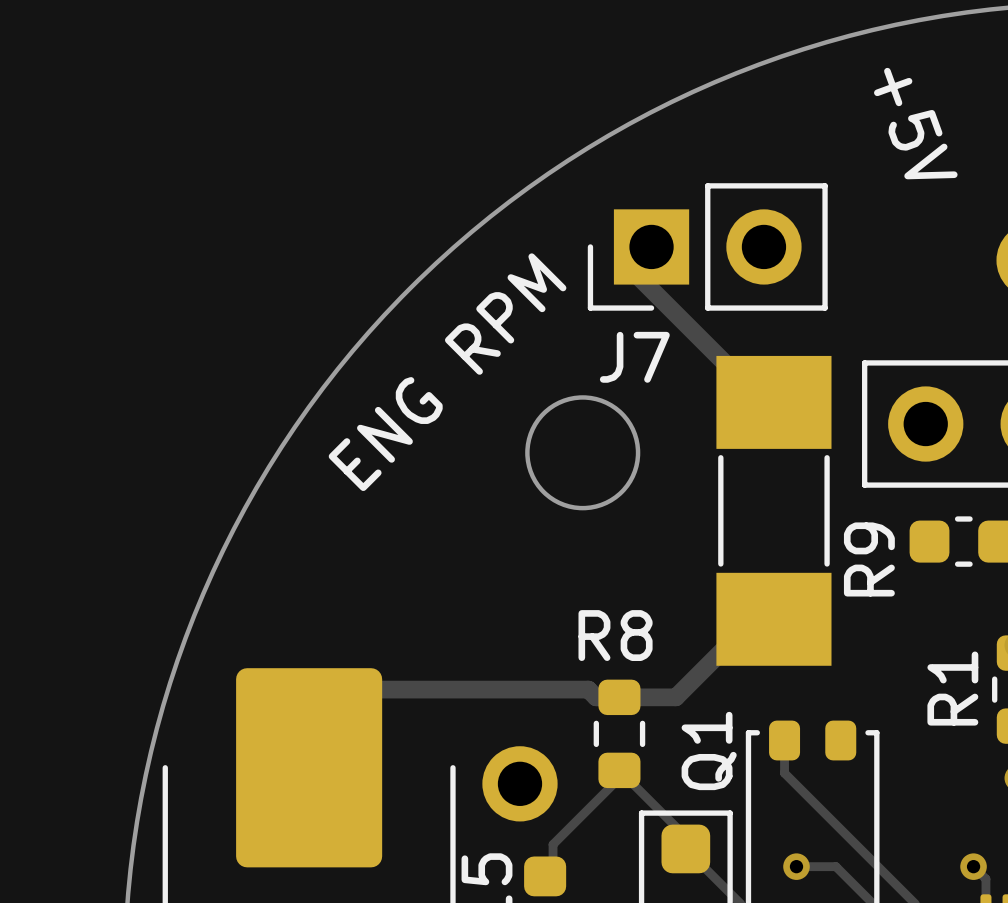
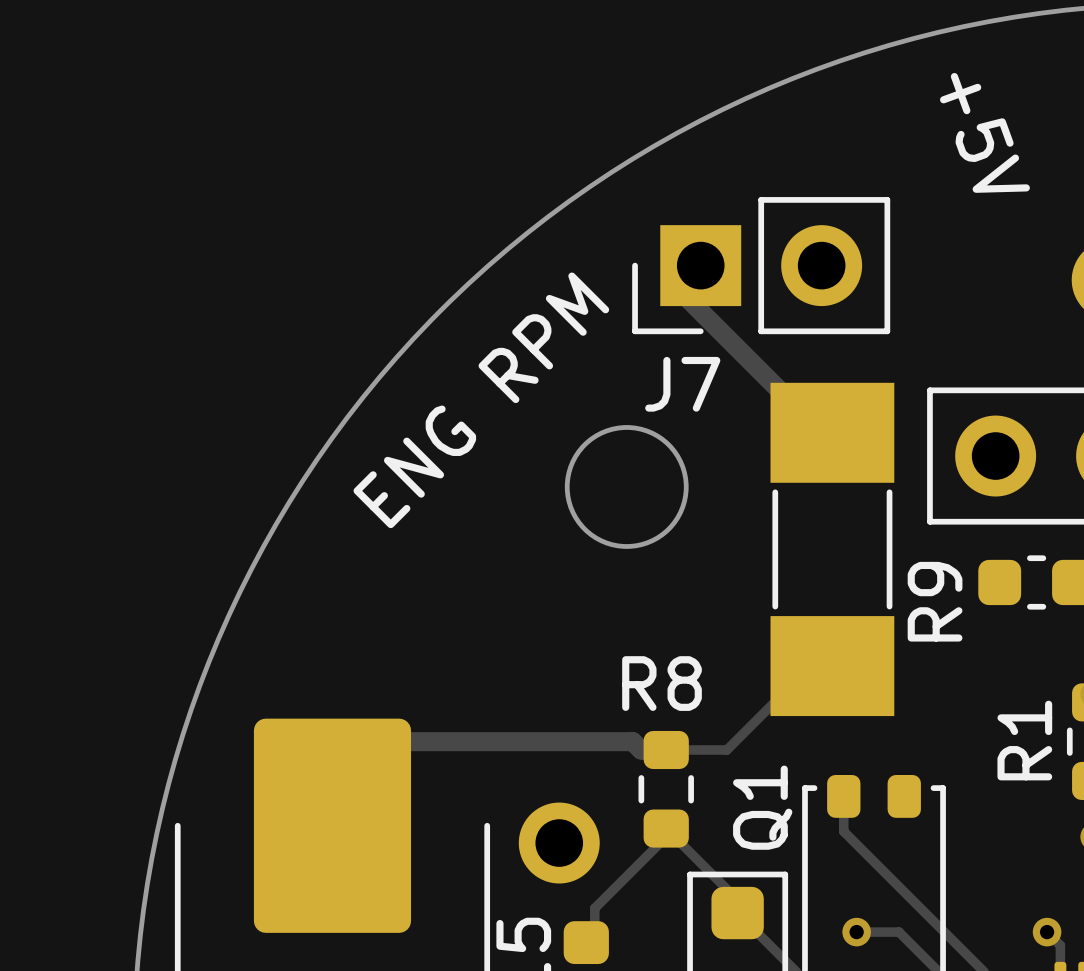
track width: thick (752, 620) (675, 697) (619, 697) -> thin (809, 667) (726, 750) (666, 750)

